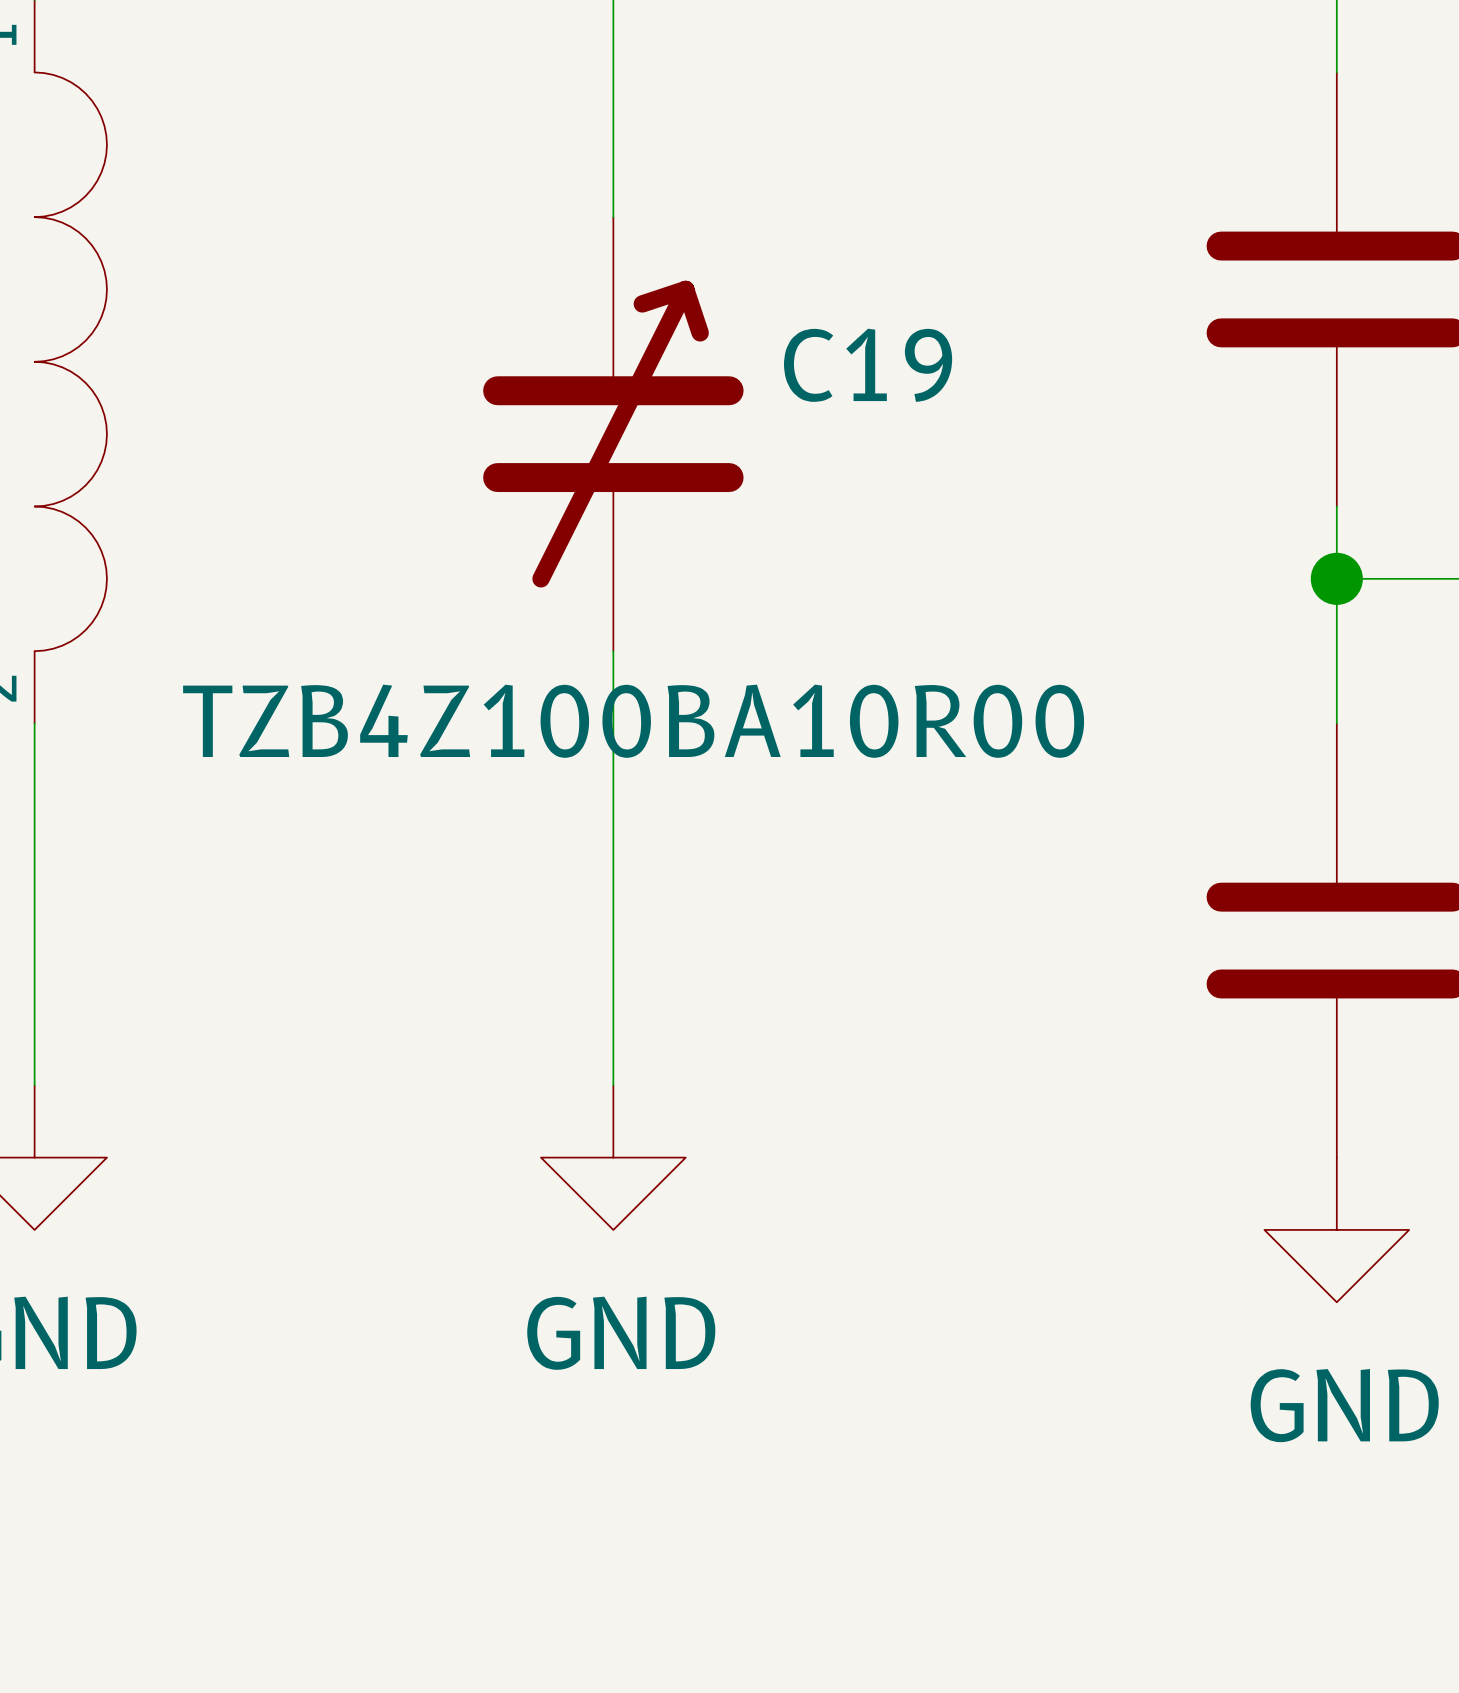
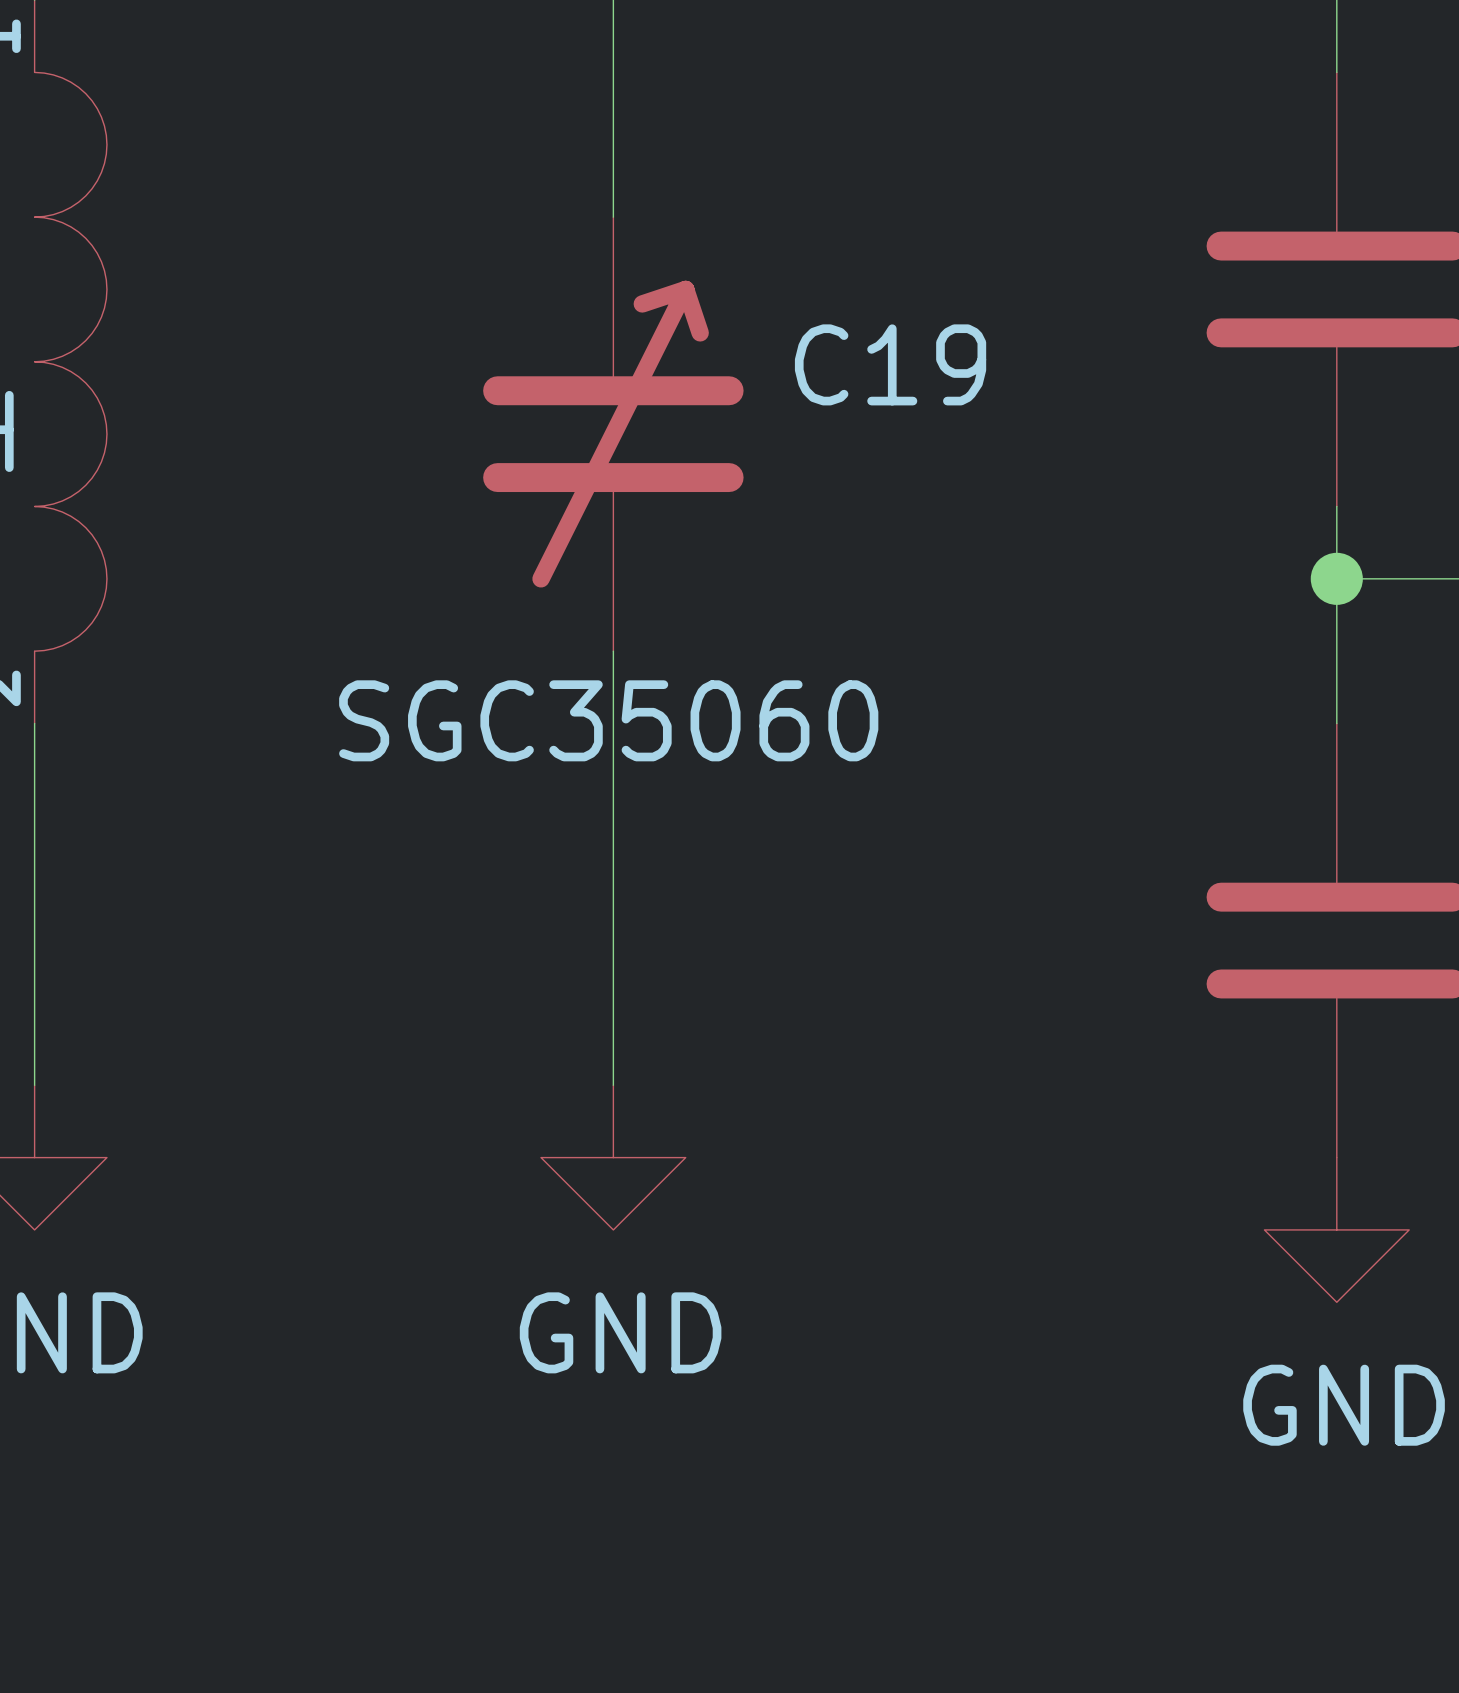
C19 value: TZB4Z100BA10R00 (633, 721) -> SGC35060 (608, 720)

